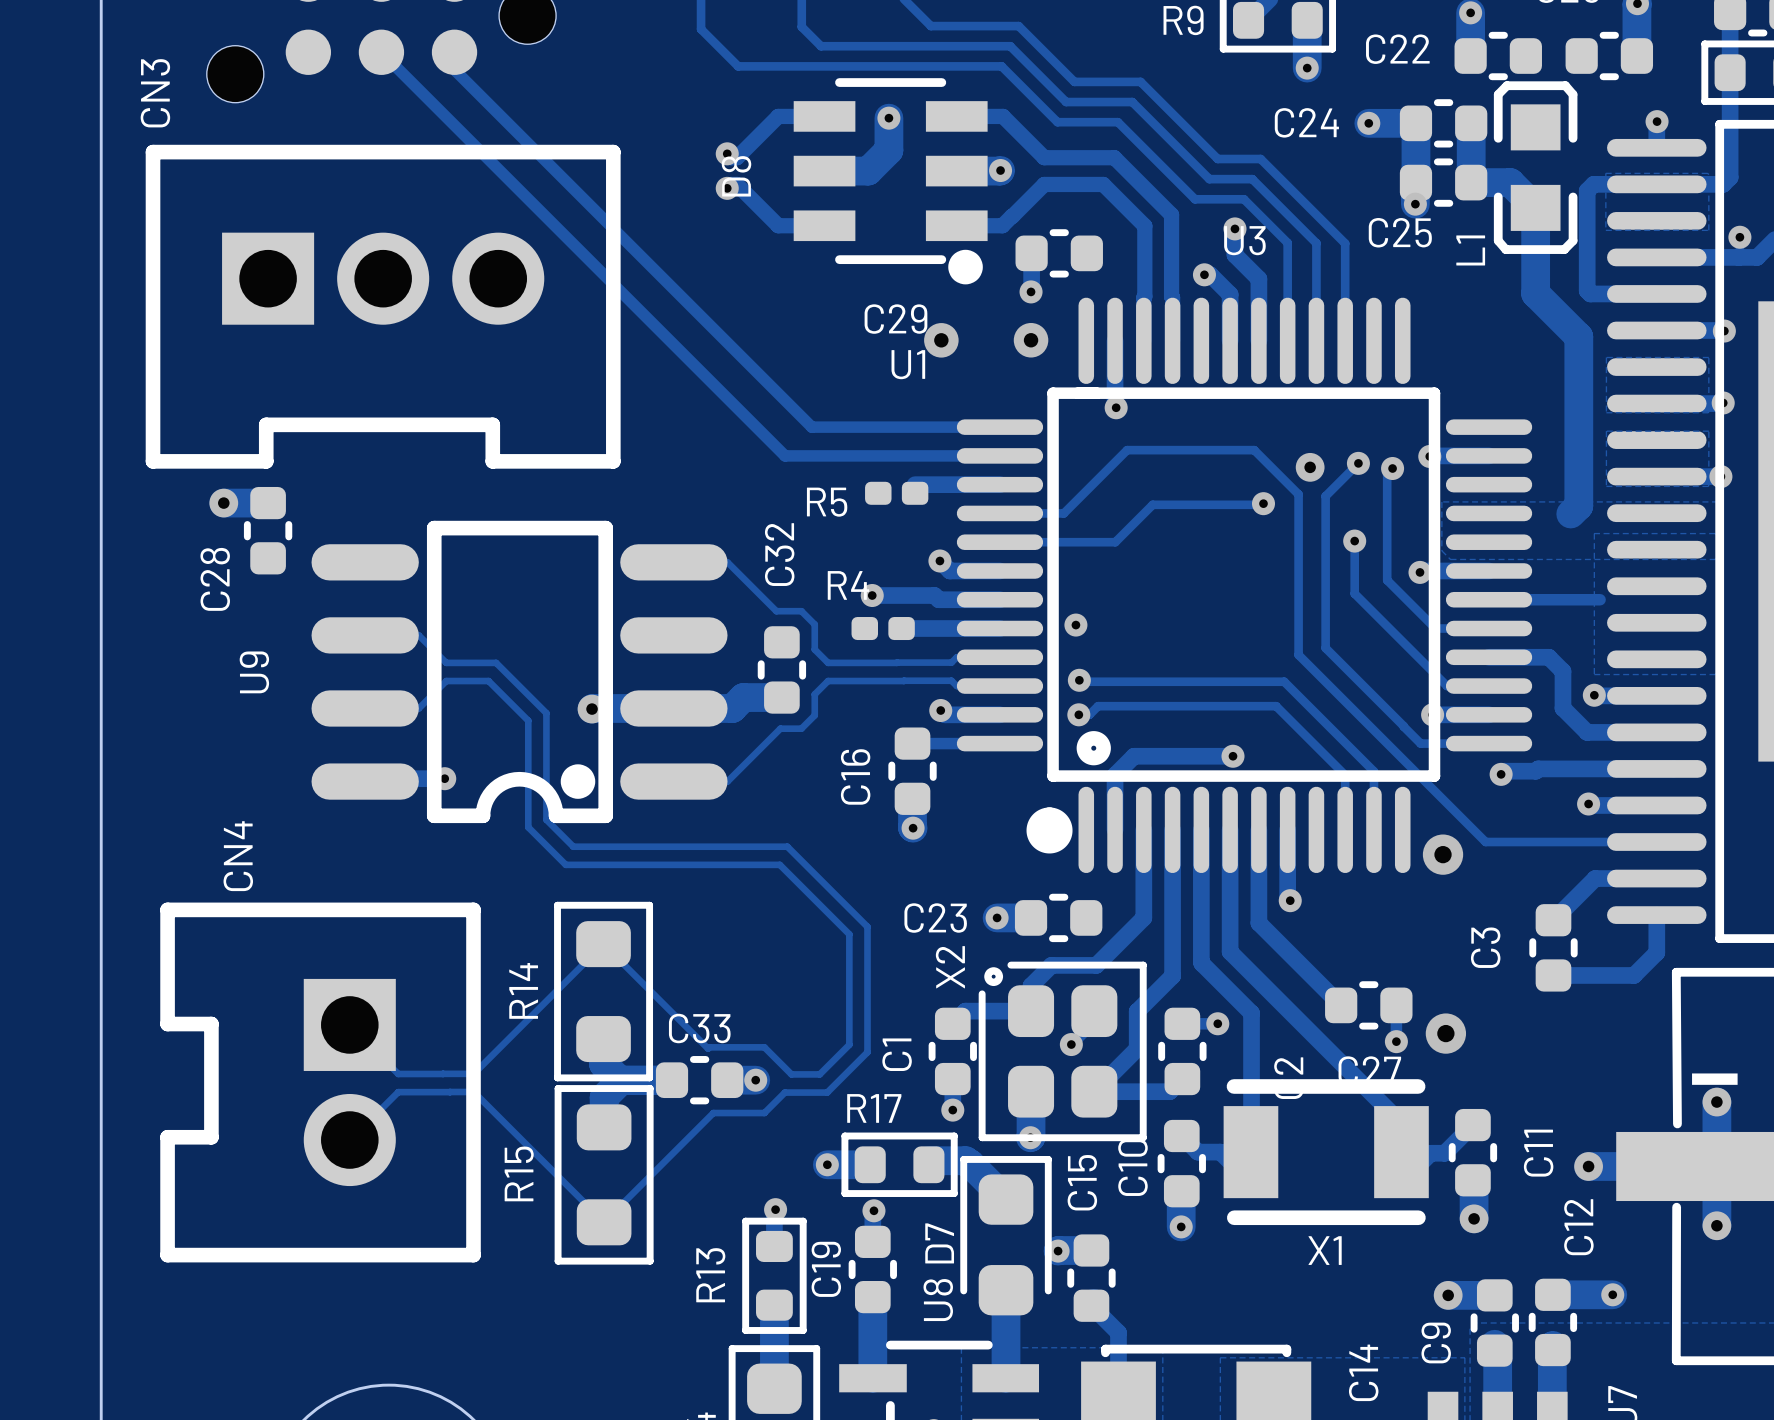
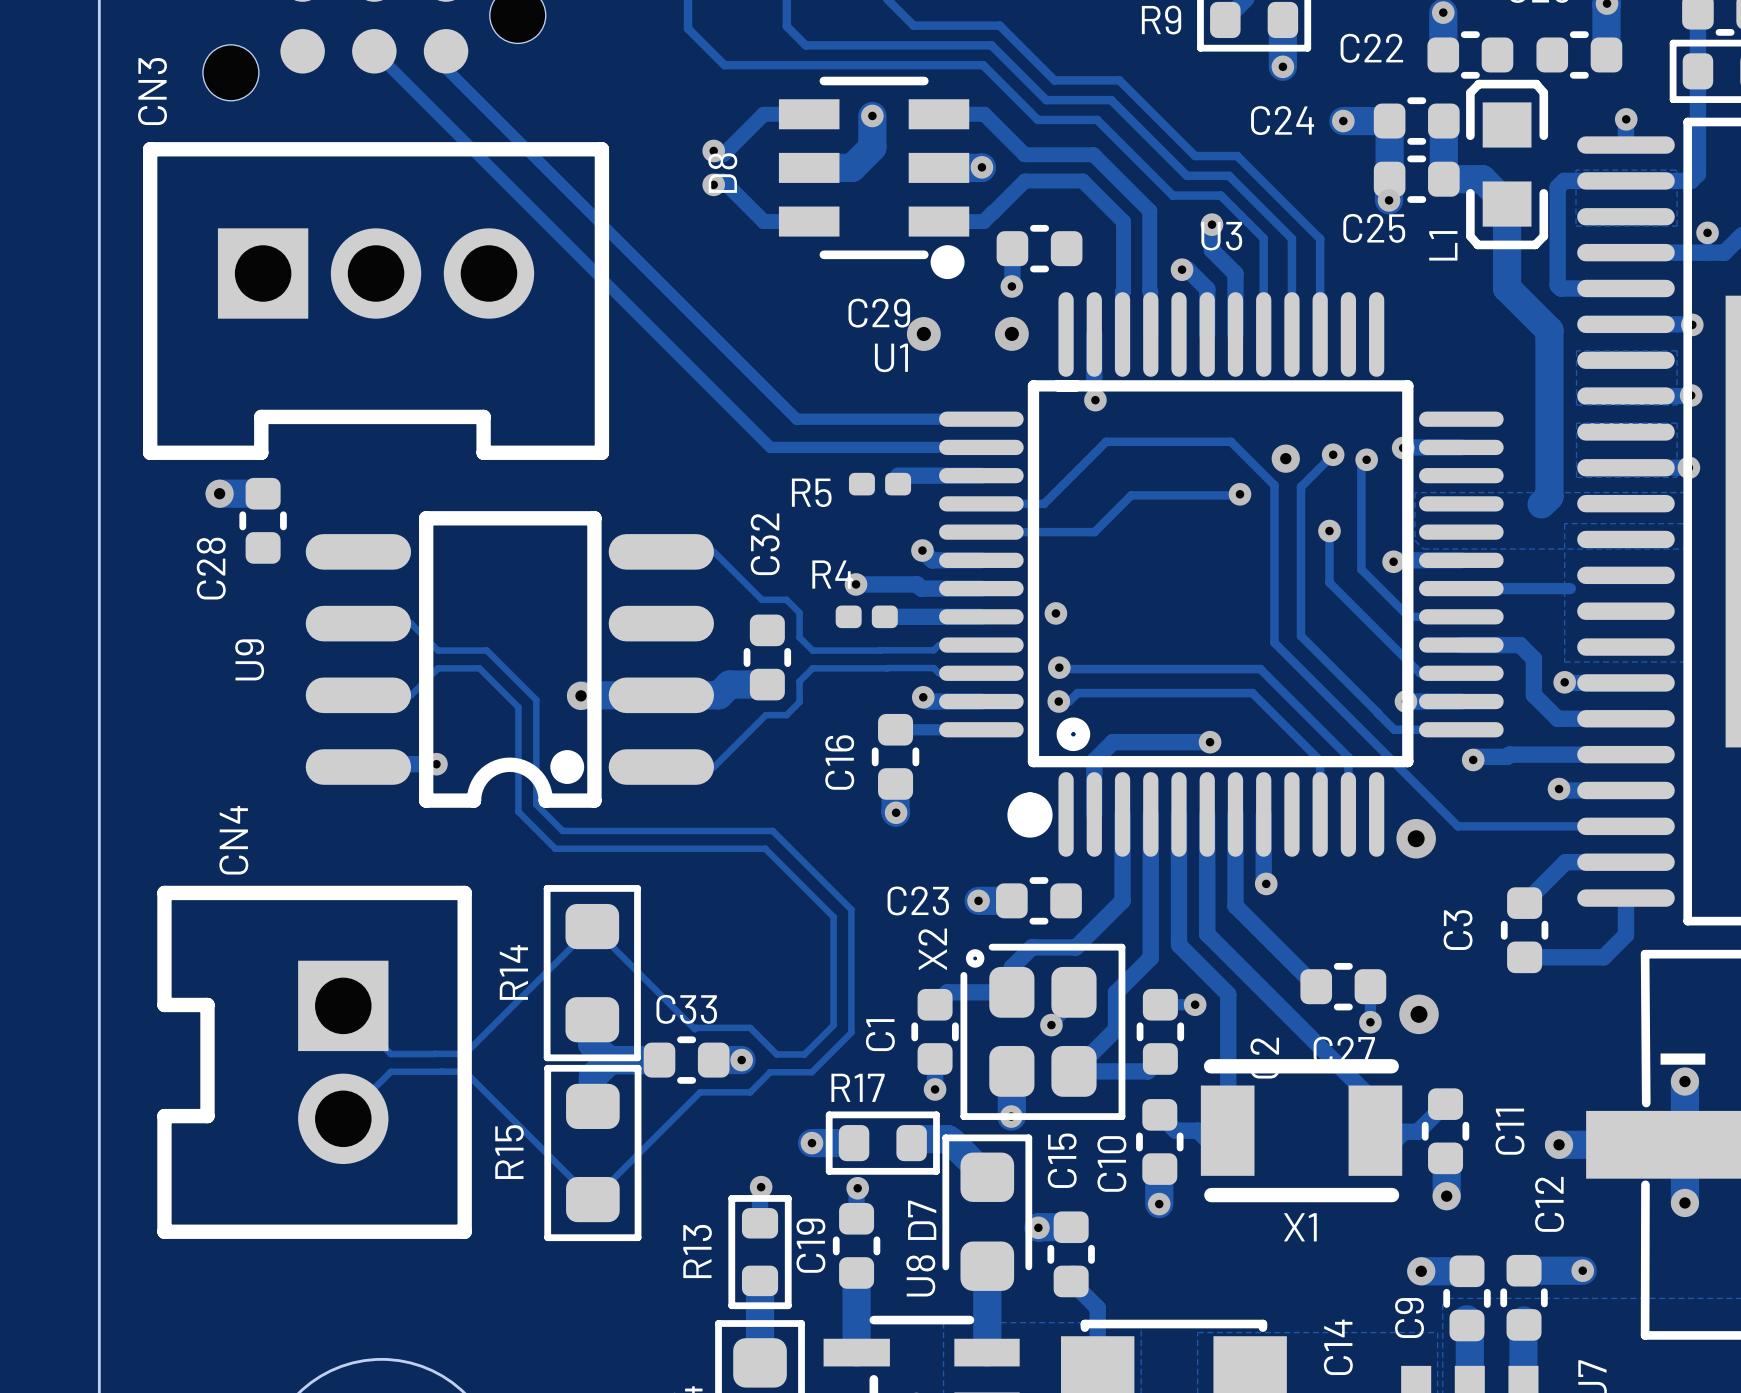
C10 name position: C10 (1132, 1167) -> C10 (1111, 1163)

